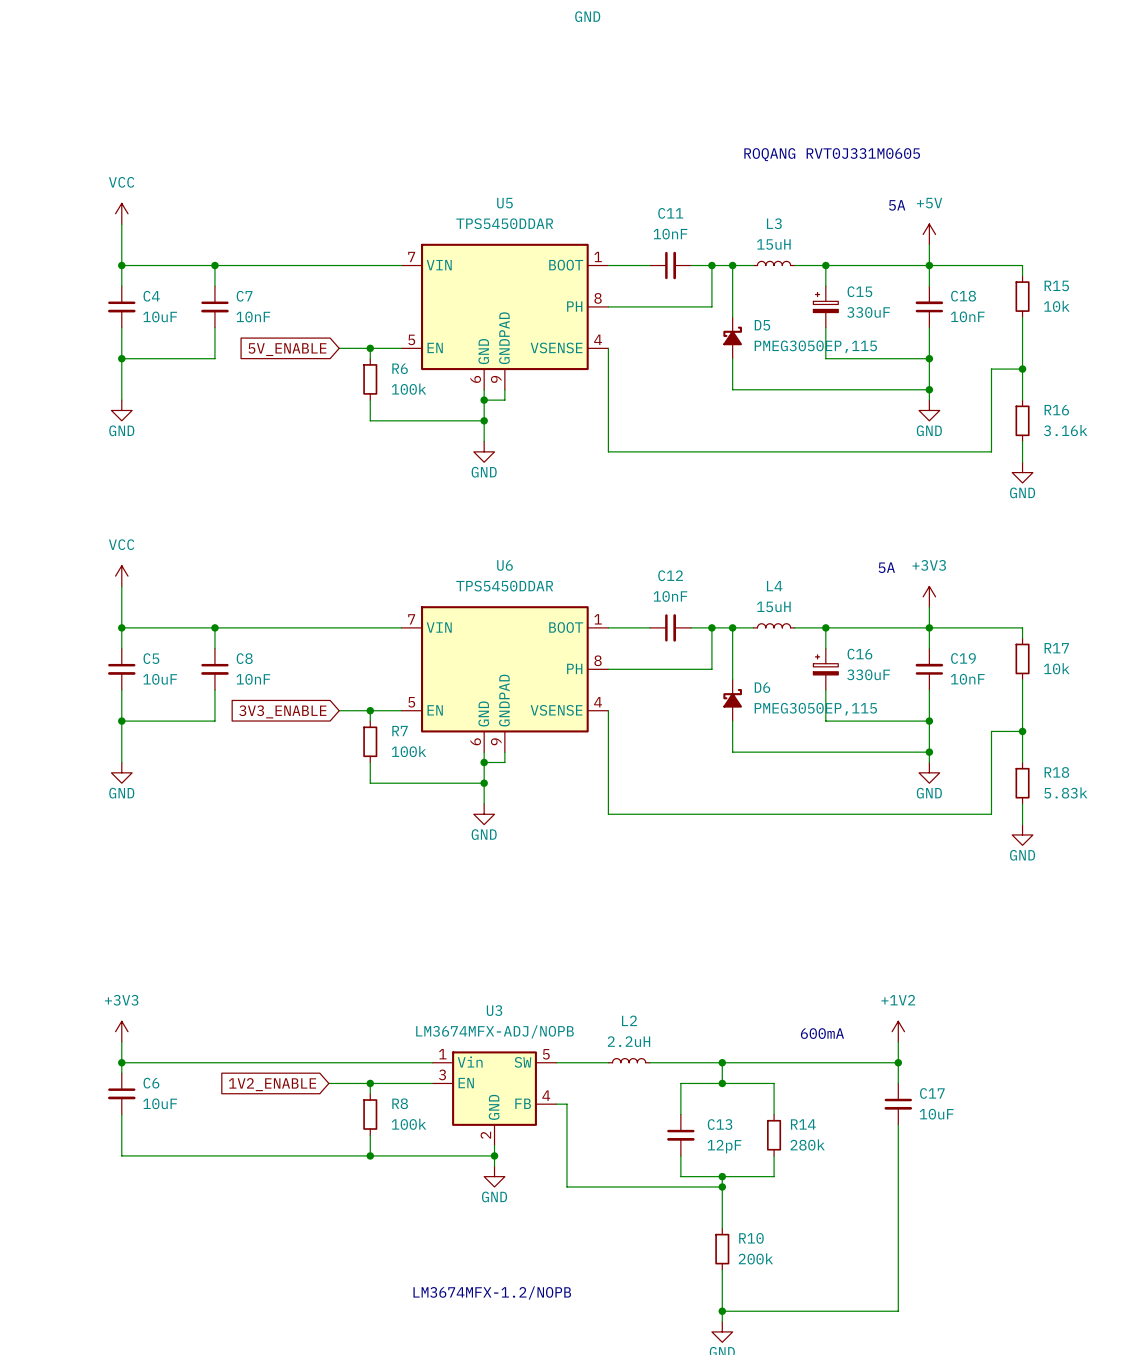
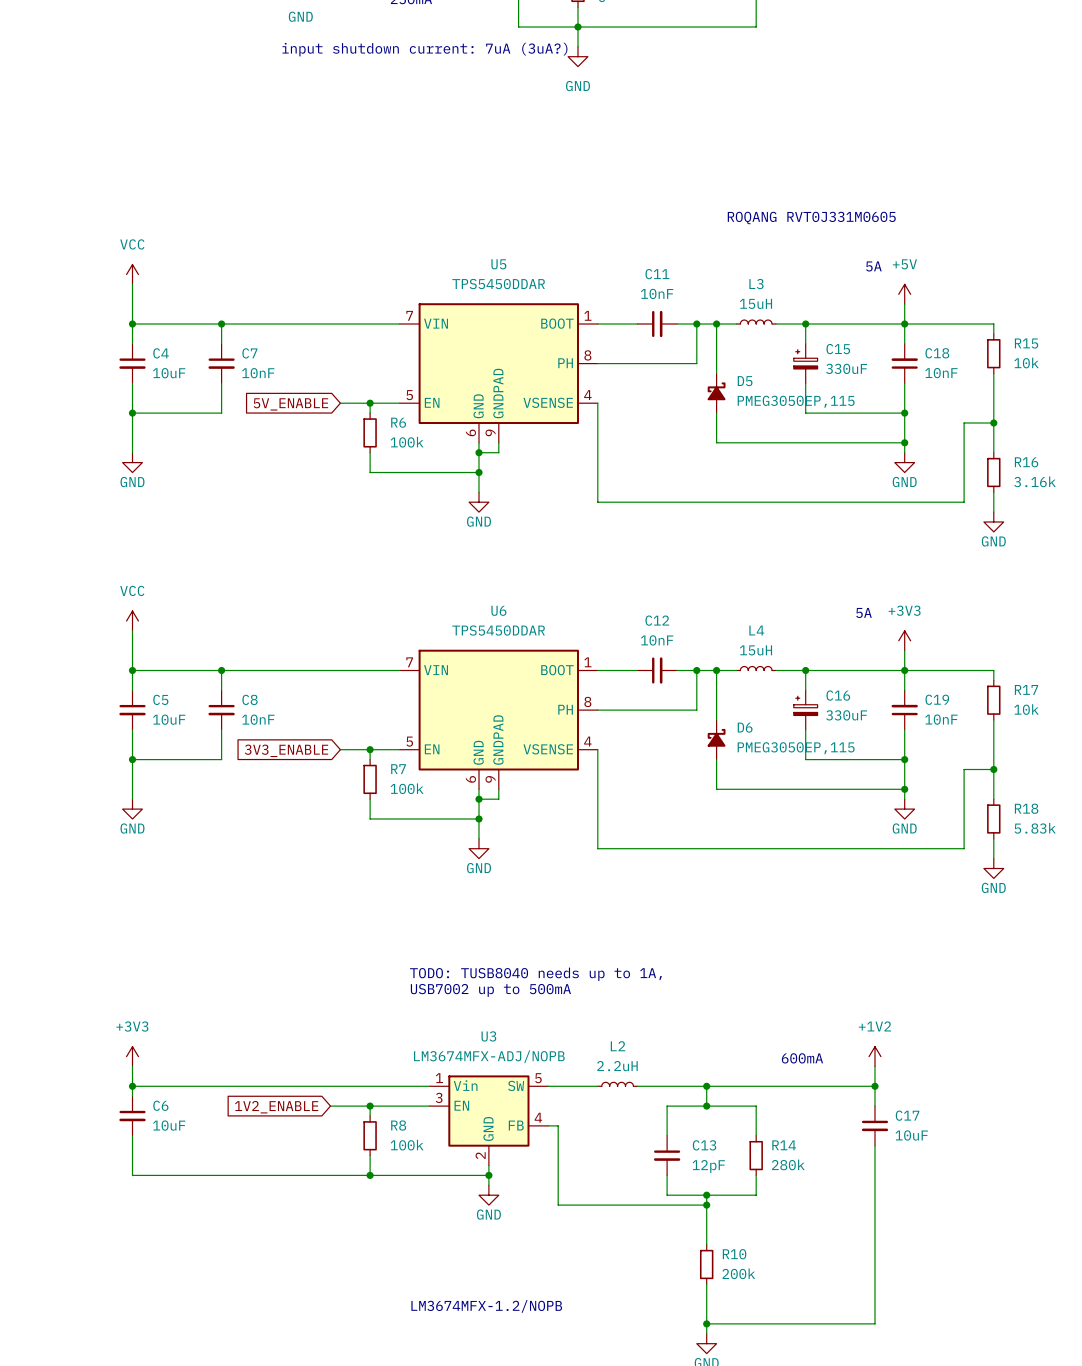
text: none -> TODO: TUSB8040 needs up to 1A, (536, 974)
text: none -> USB7002 up to 500mA (490, 990)

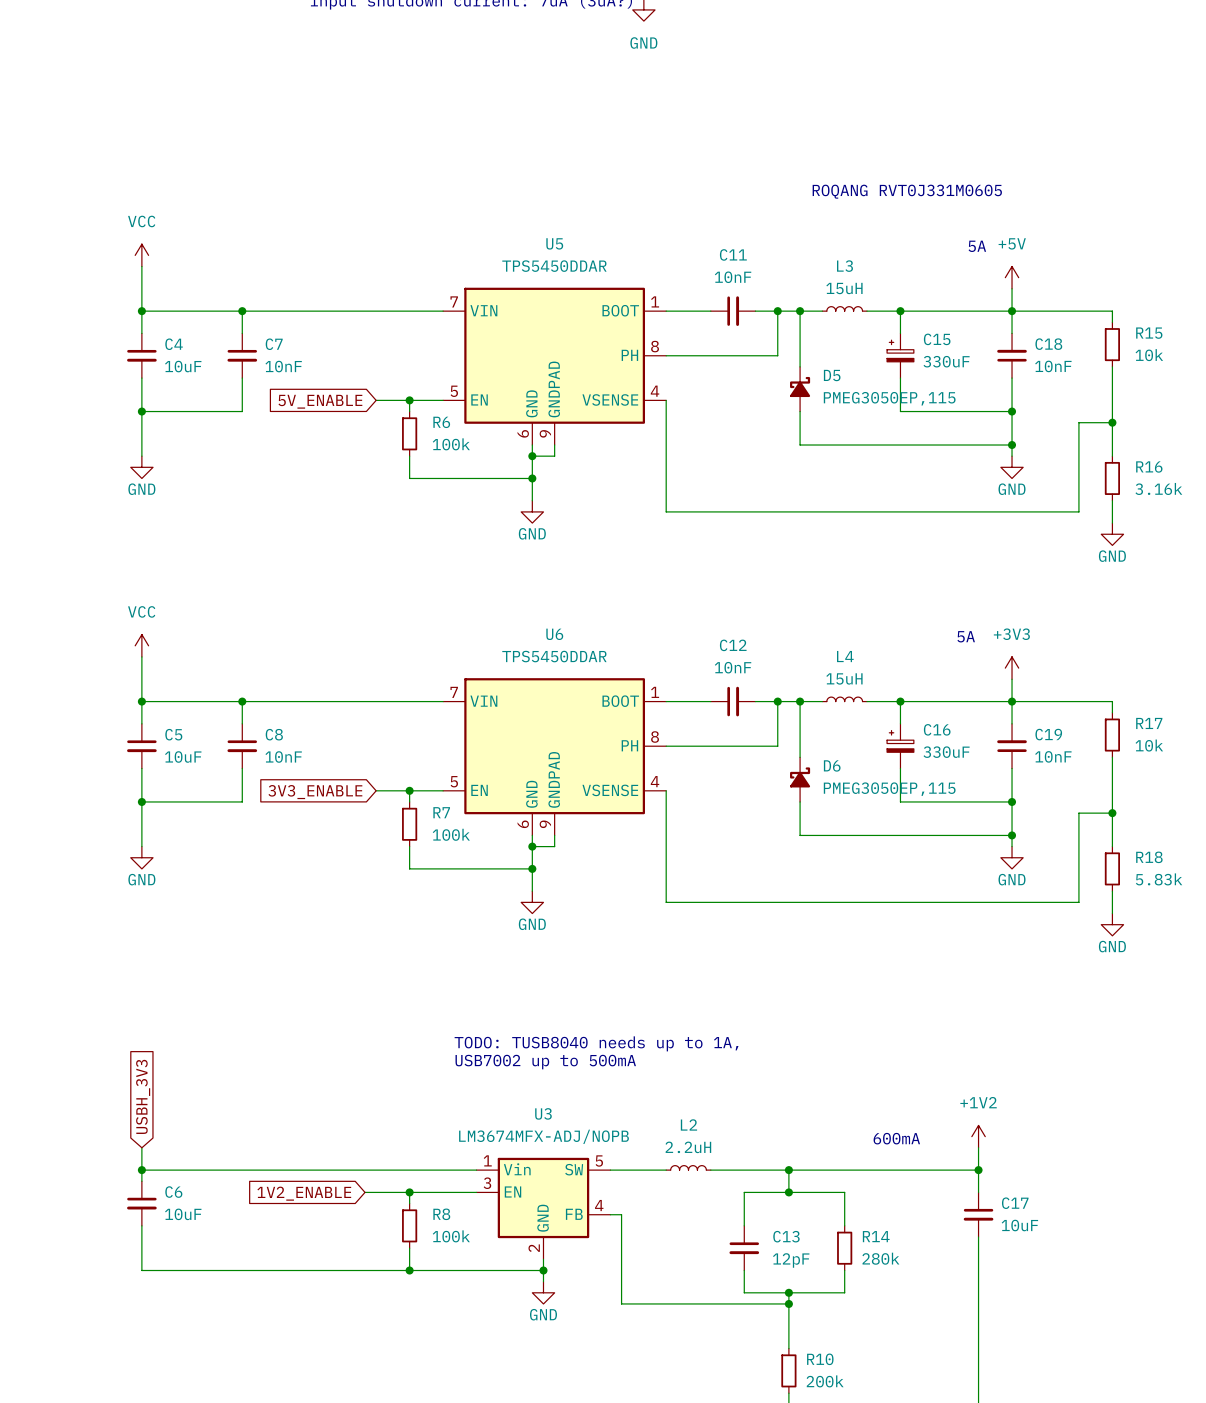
global label: none -> USBH_3V3 (143, 1096)
power symbol: +3V3 (132, 1056) -> none

